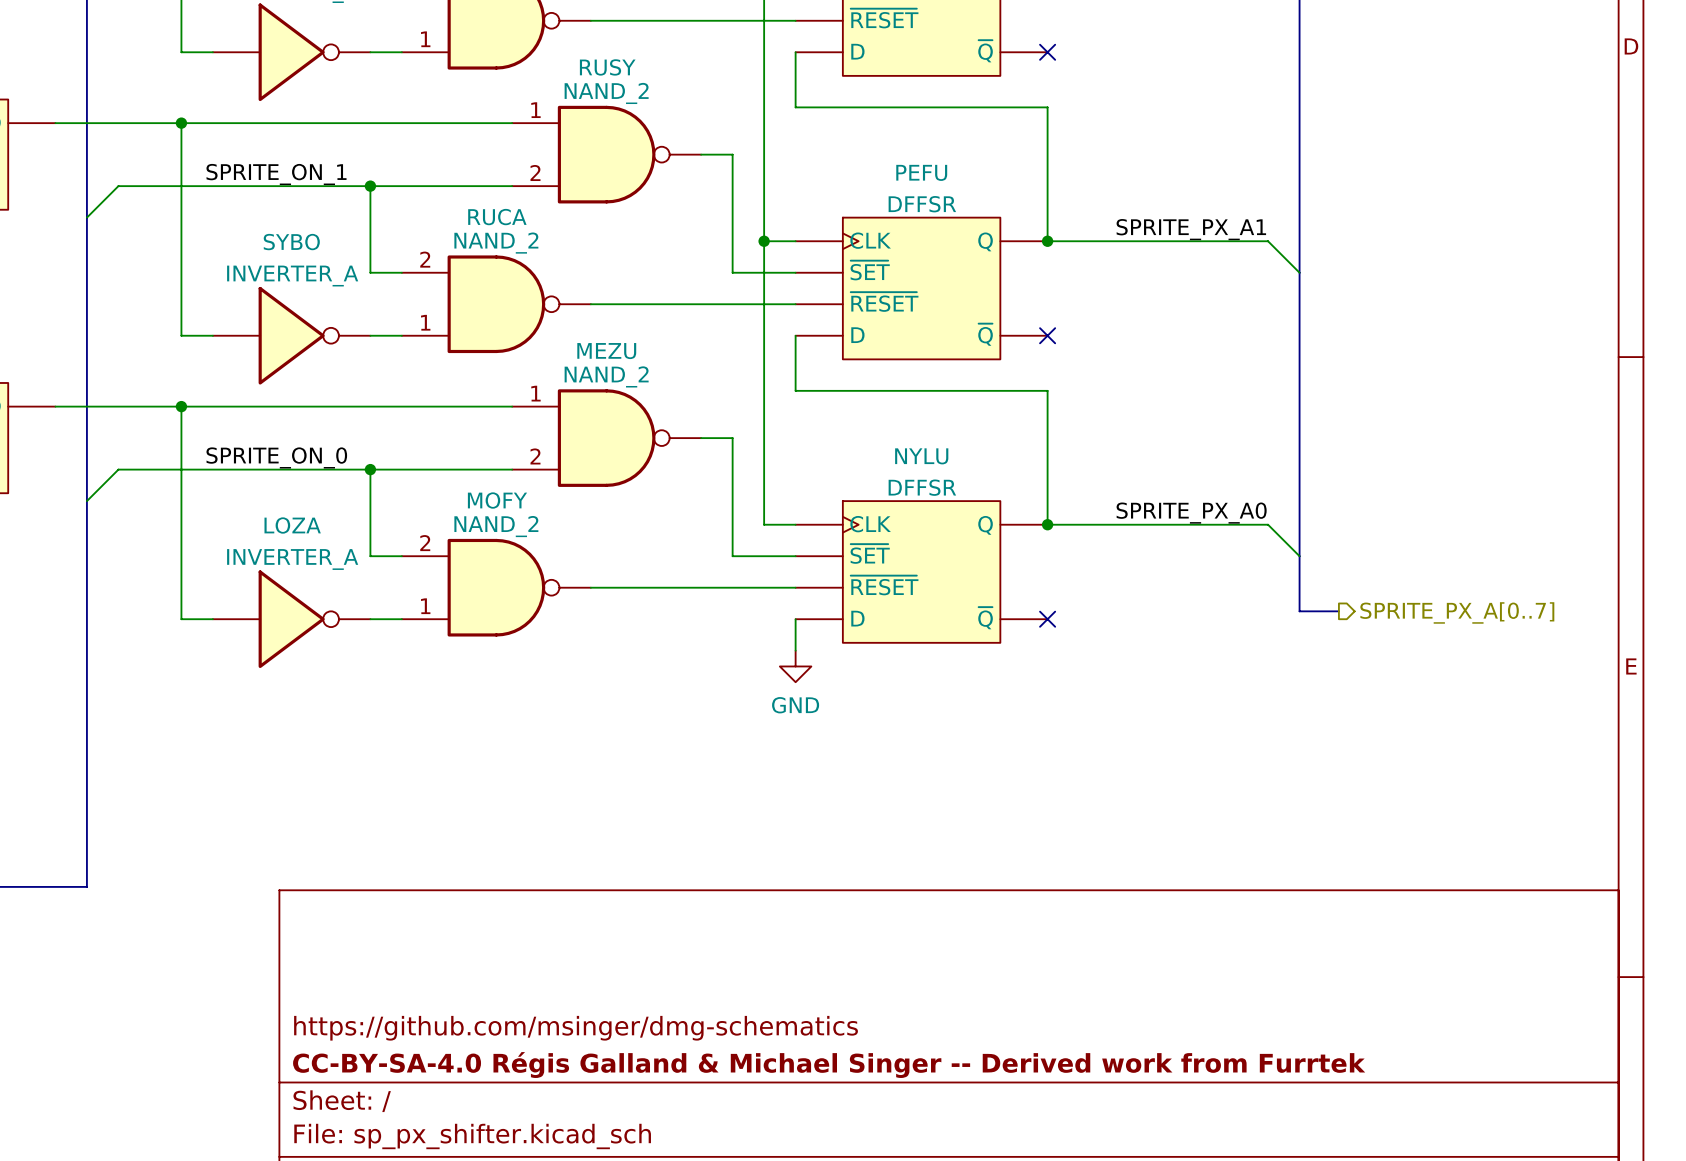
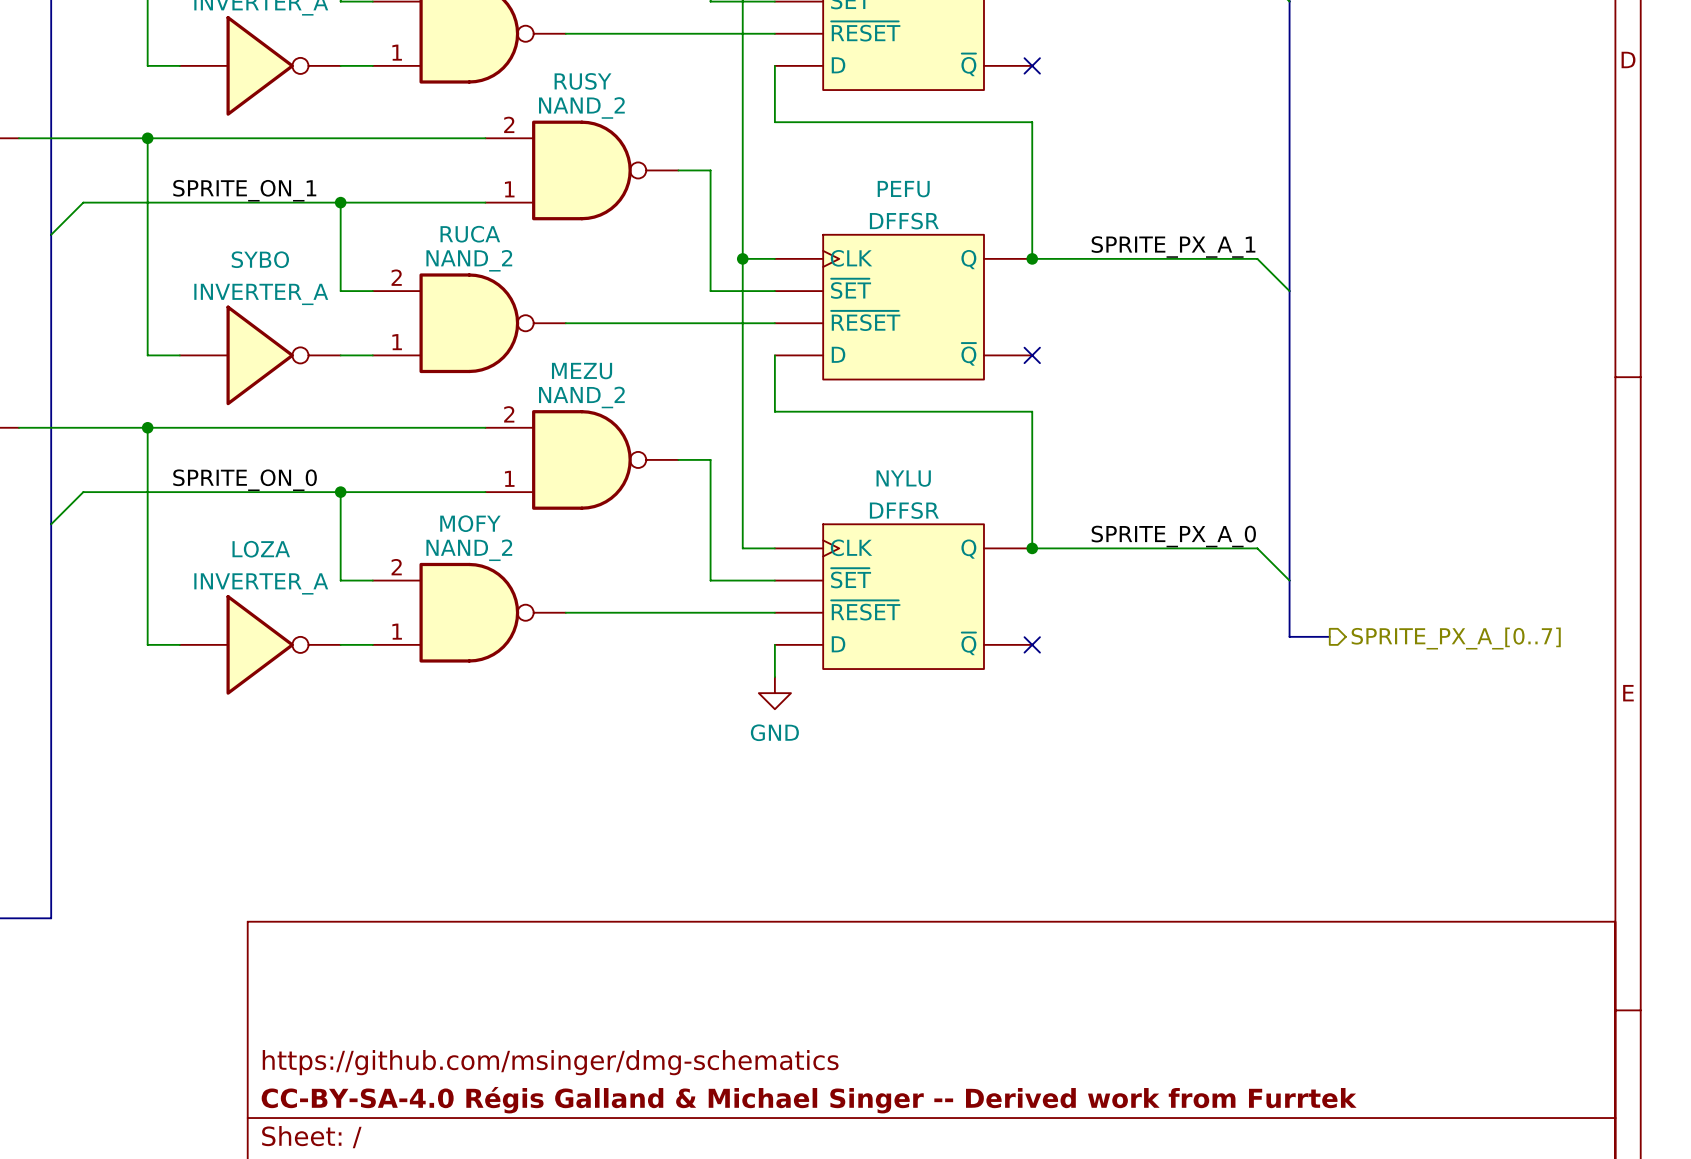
RUSY flip: as is (606, 154) -> up-down (581, 170)
label: SPRITE_PX_A1 (1191, 229) -> SPRITE_PX_A_1 (1173, 247)
MEZU flip: as is (606, 438) -> up-down (581, 459)
label: SPRITE_PX_A0 (1191, 513) -> SPRITE_PX_A_0 (1173, 536)
hierarchical label: SPRITE_PX_A[0..7] (1457, 612) -> SPRITE_PX_A_[0..7] (1456, 638)

